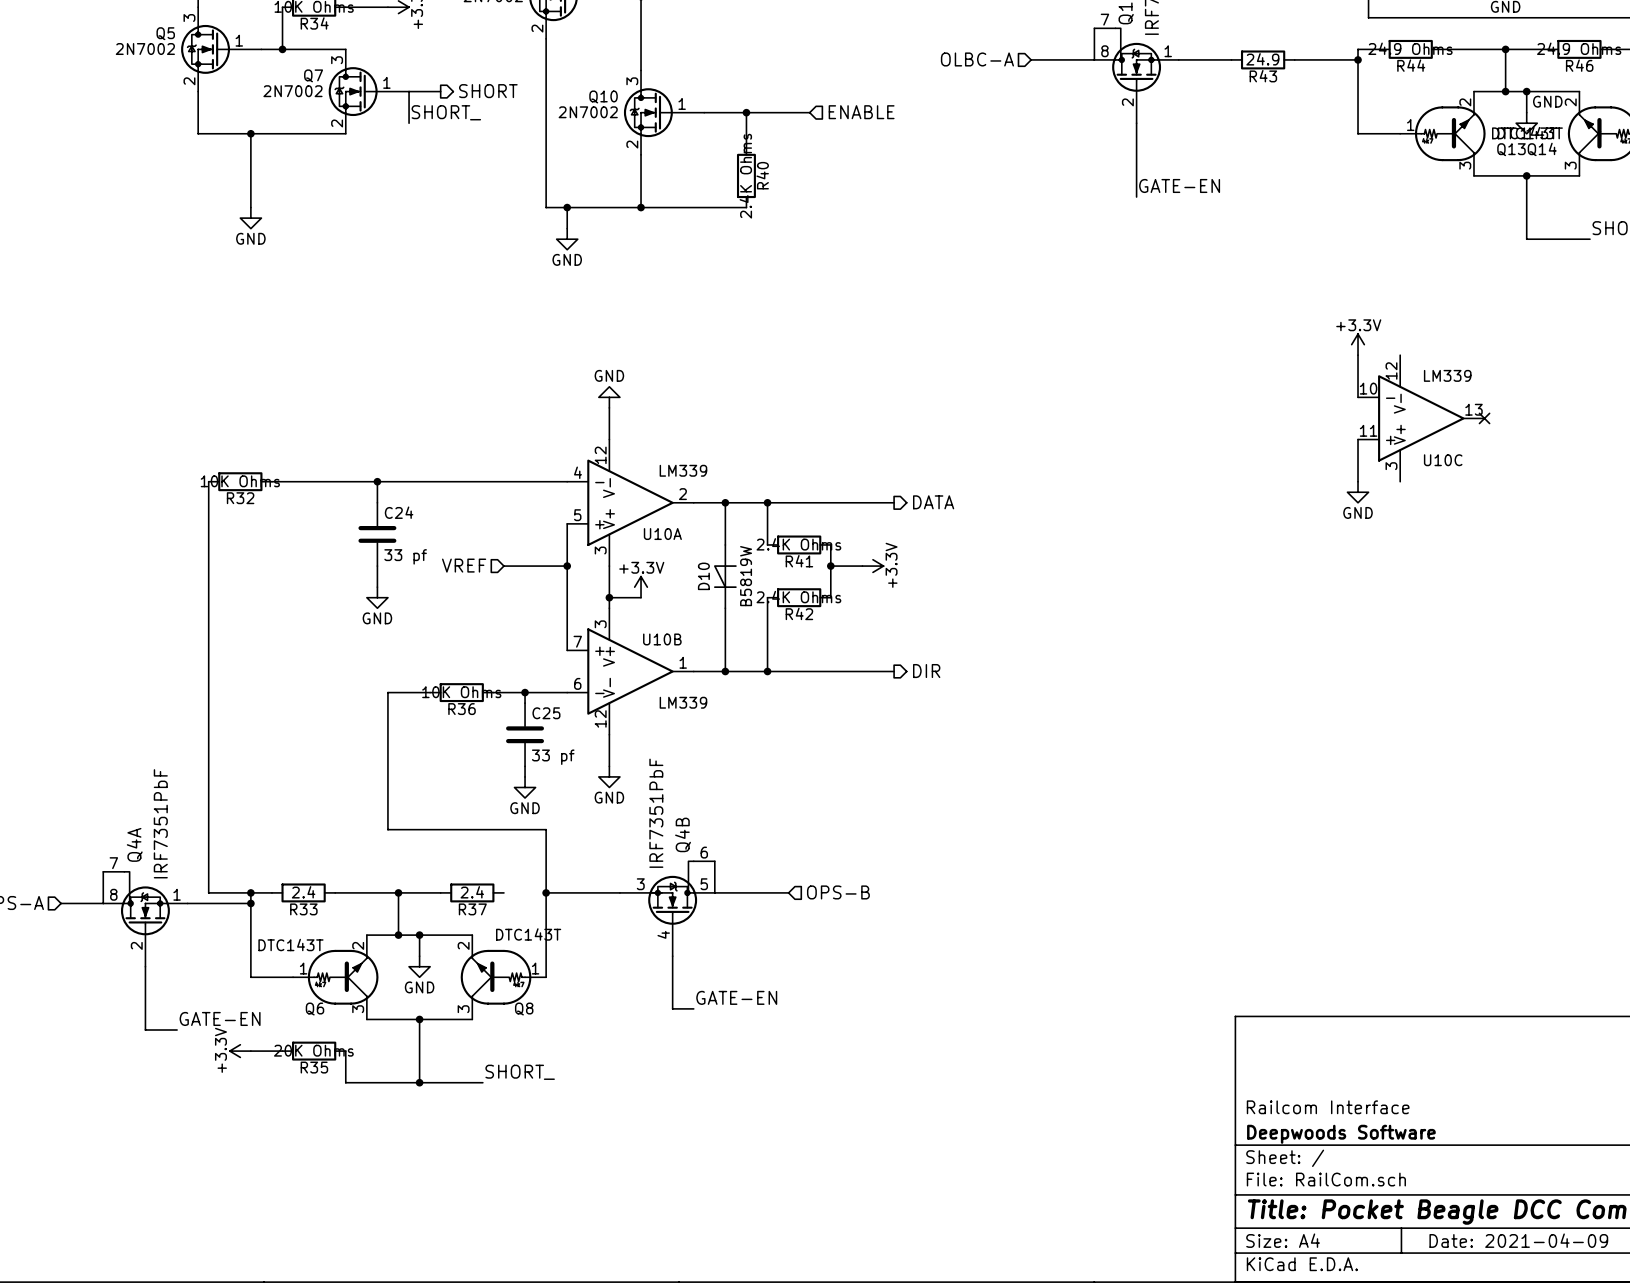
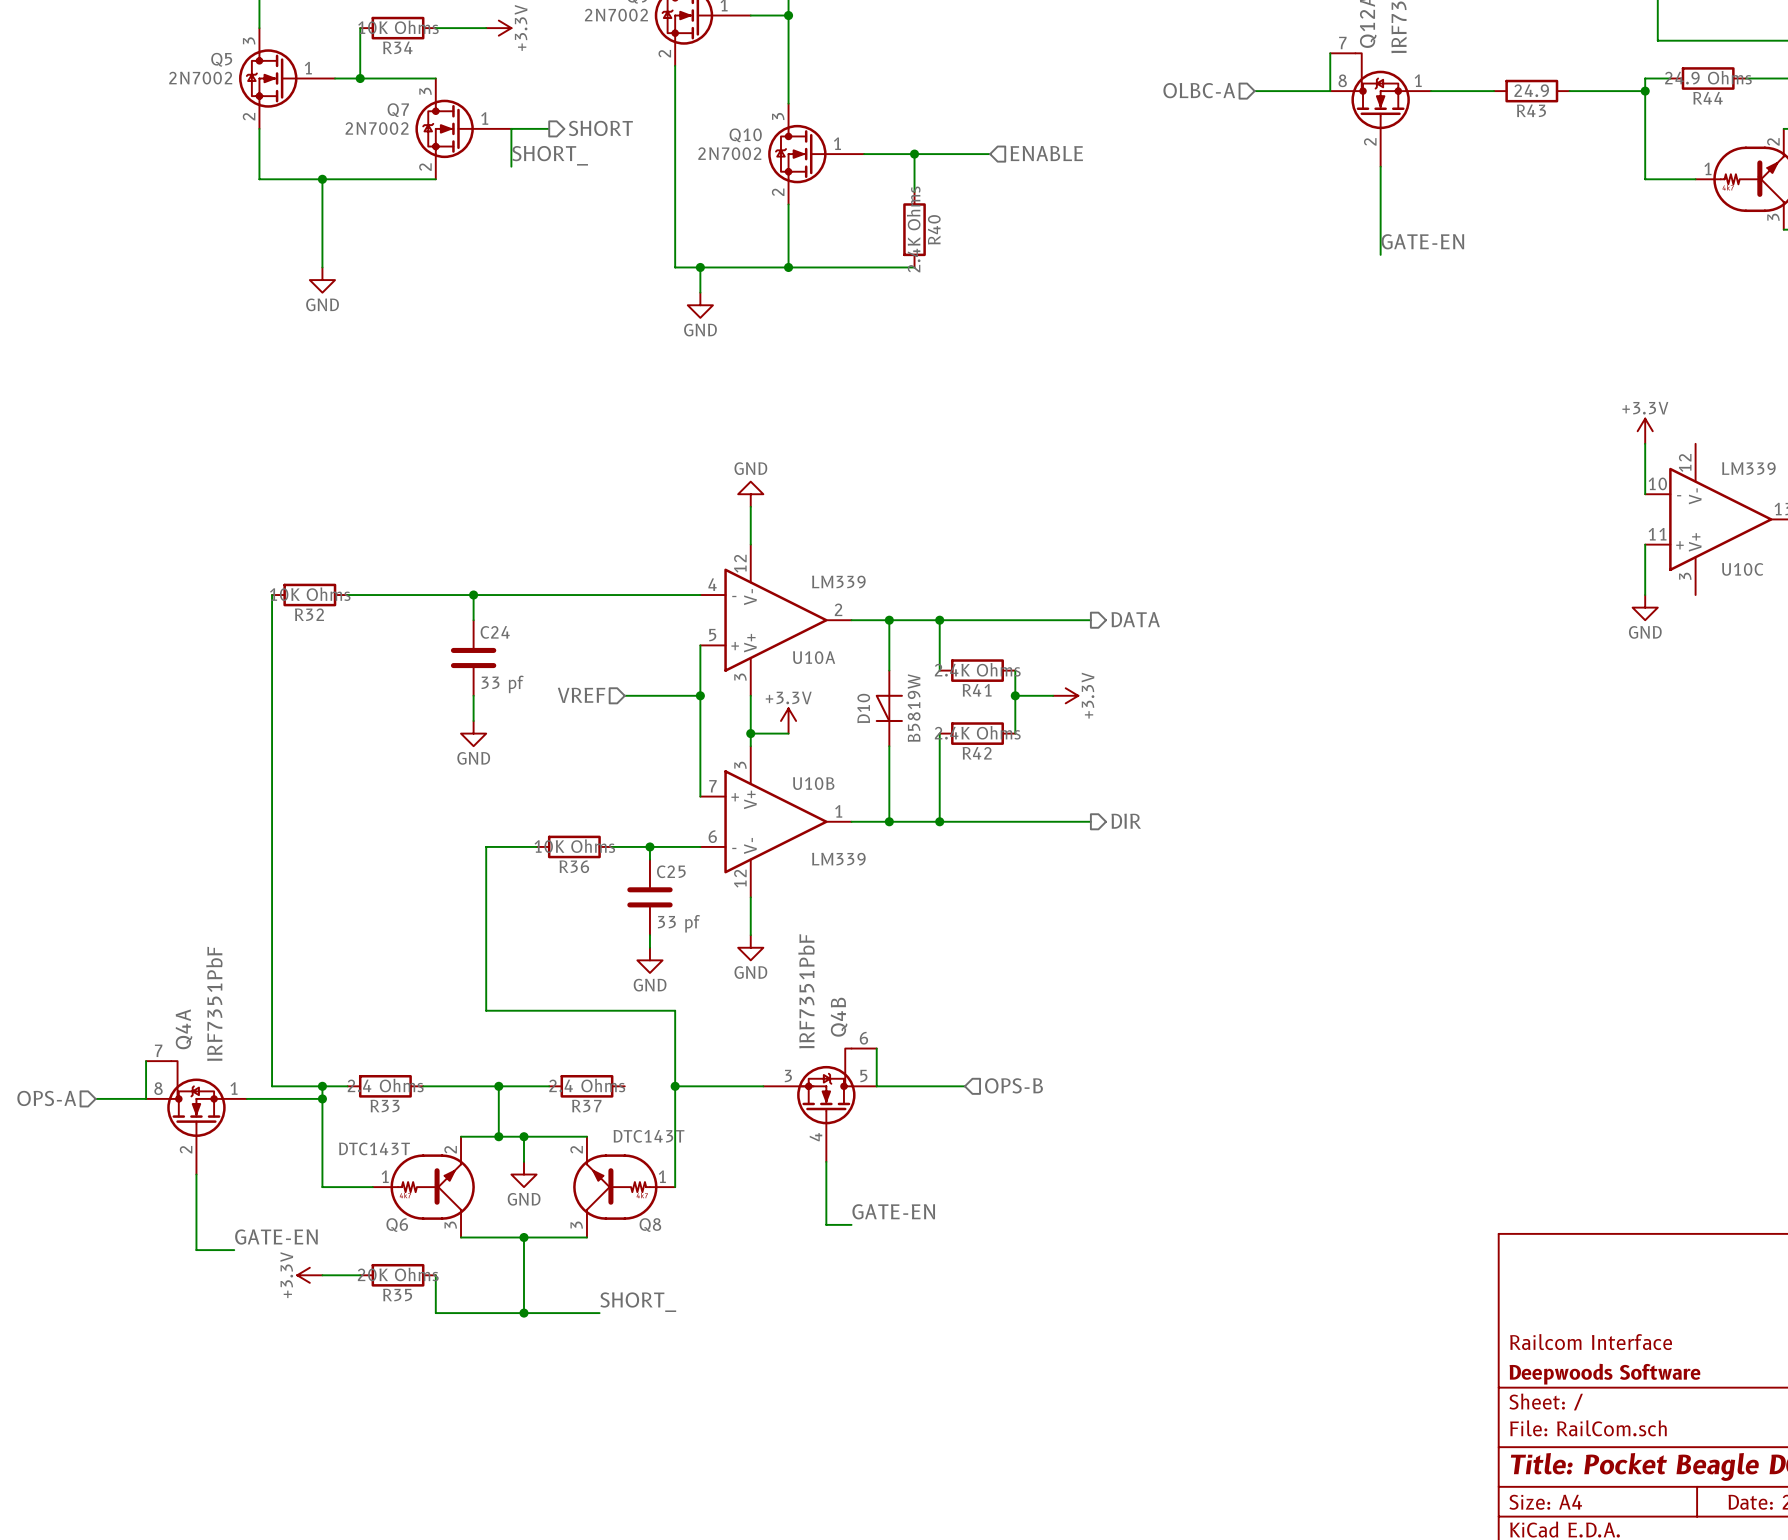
R33 value: 2.4 (303, 892) -> 2.4 Ohms (385, 1085)
R37 value: 2.4 (472, 892) -> 2.4 Ohms (587, 1085)

